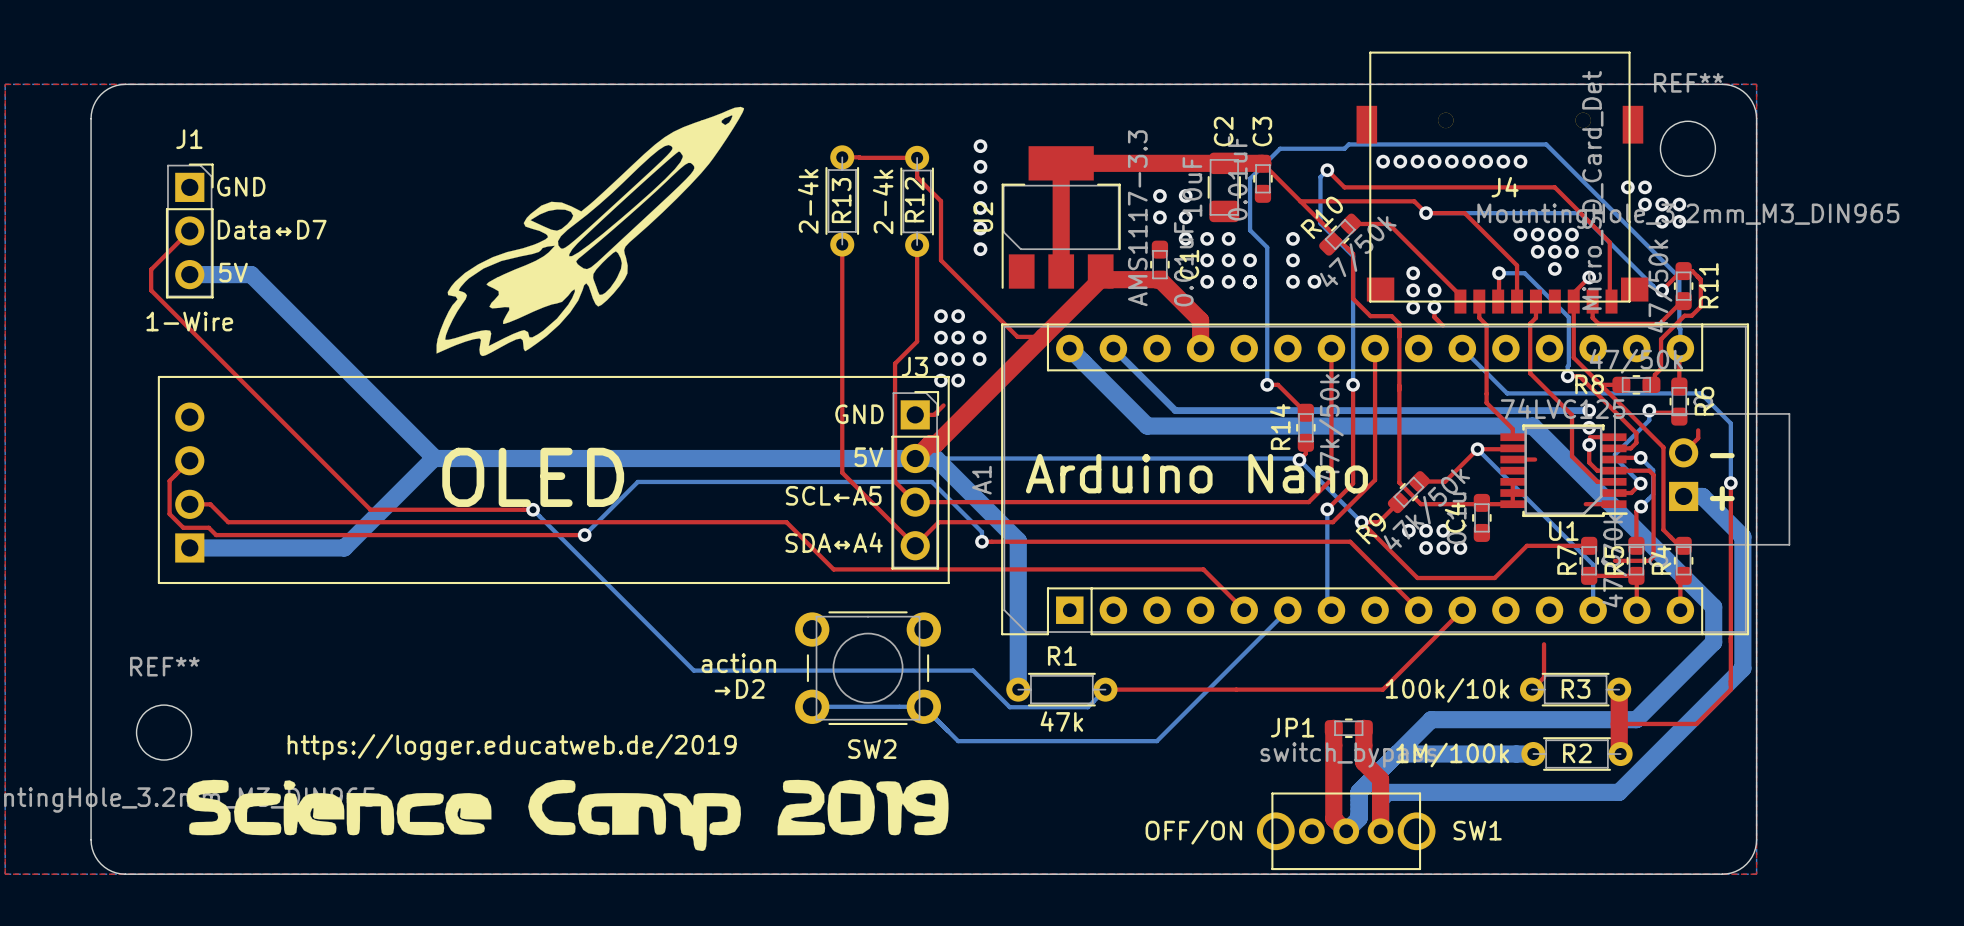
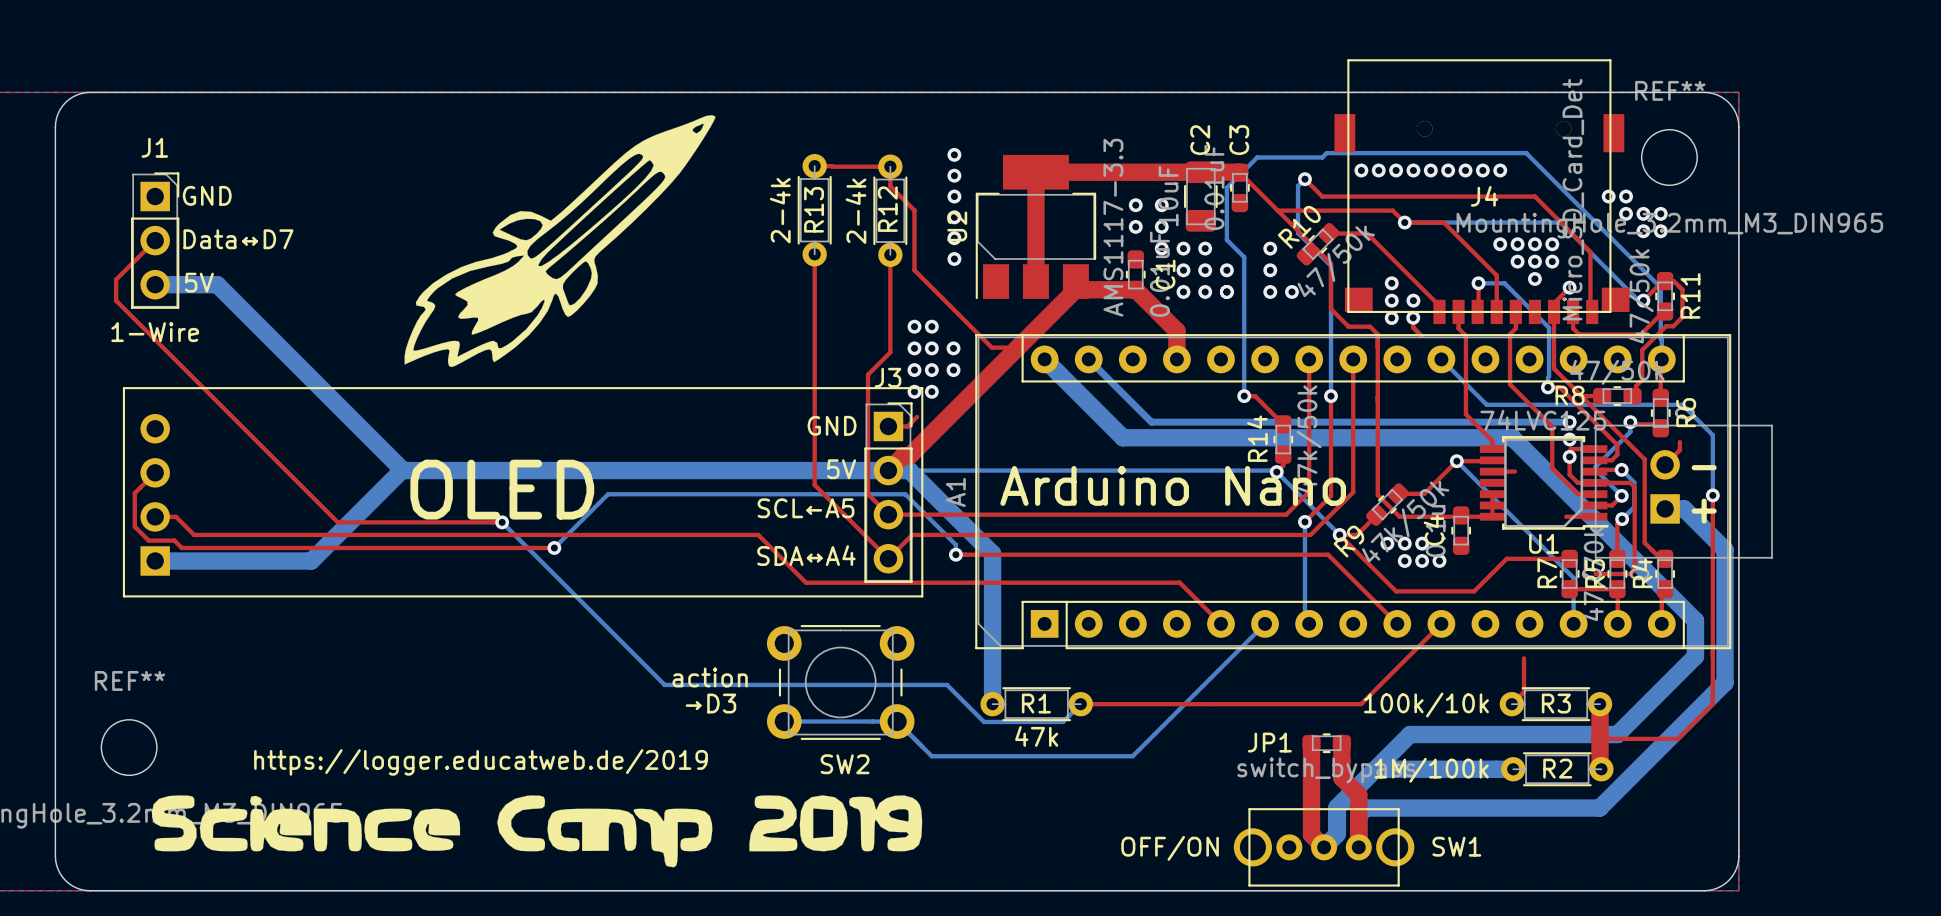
R1 name position: R1 (1062, 656) -> R1 (1036, 703)
text: →D2 (739, 688) -> →D3 (710, 703)

